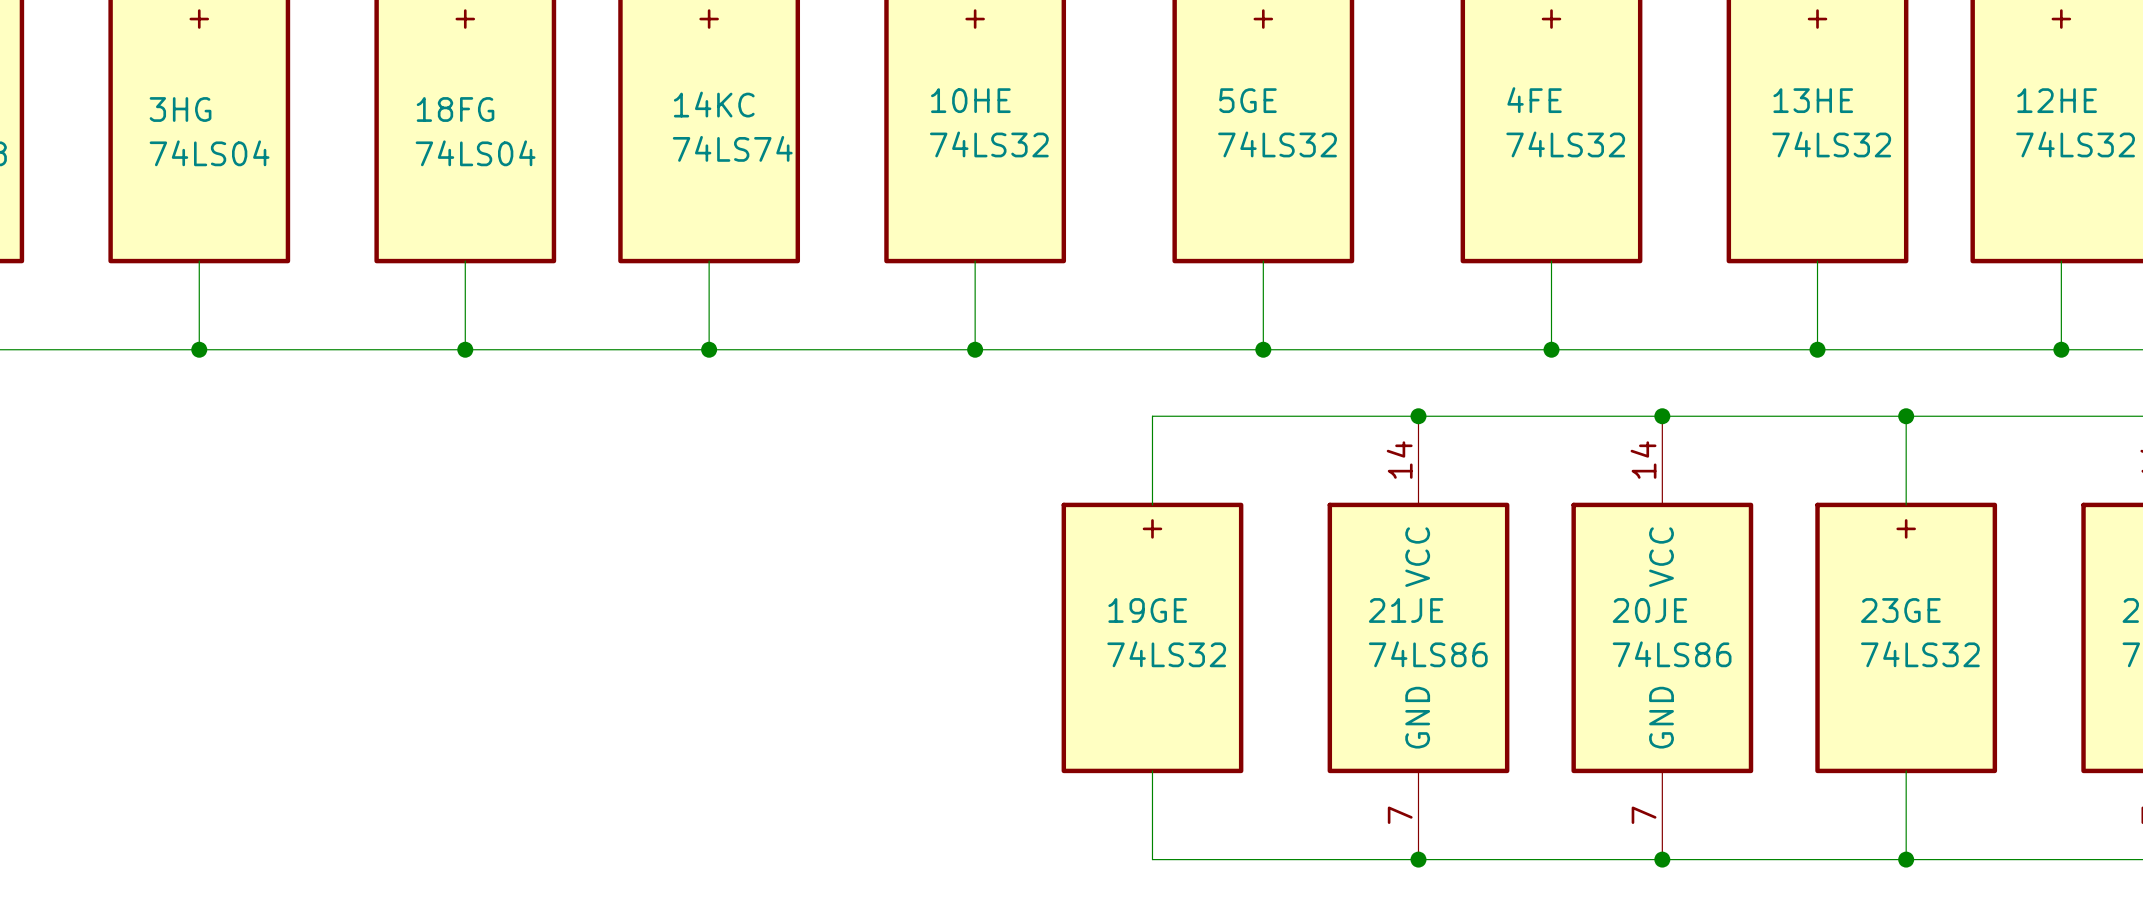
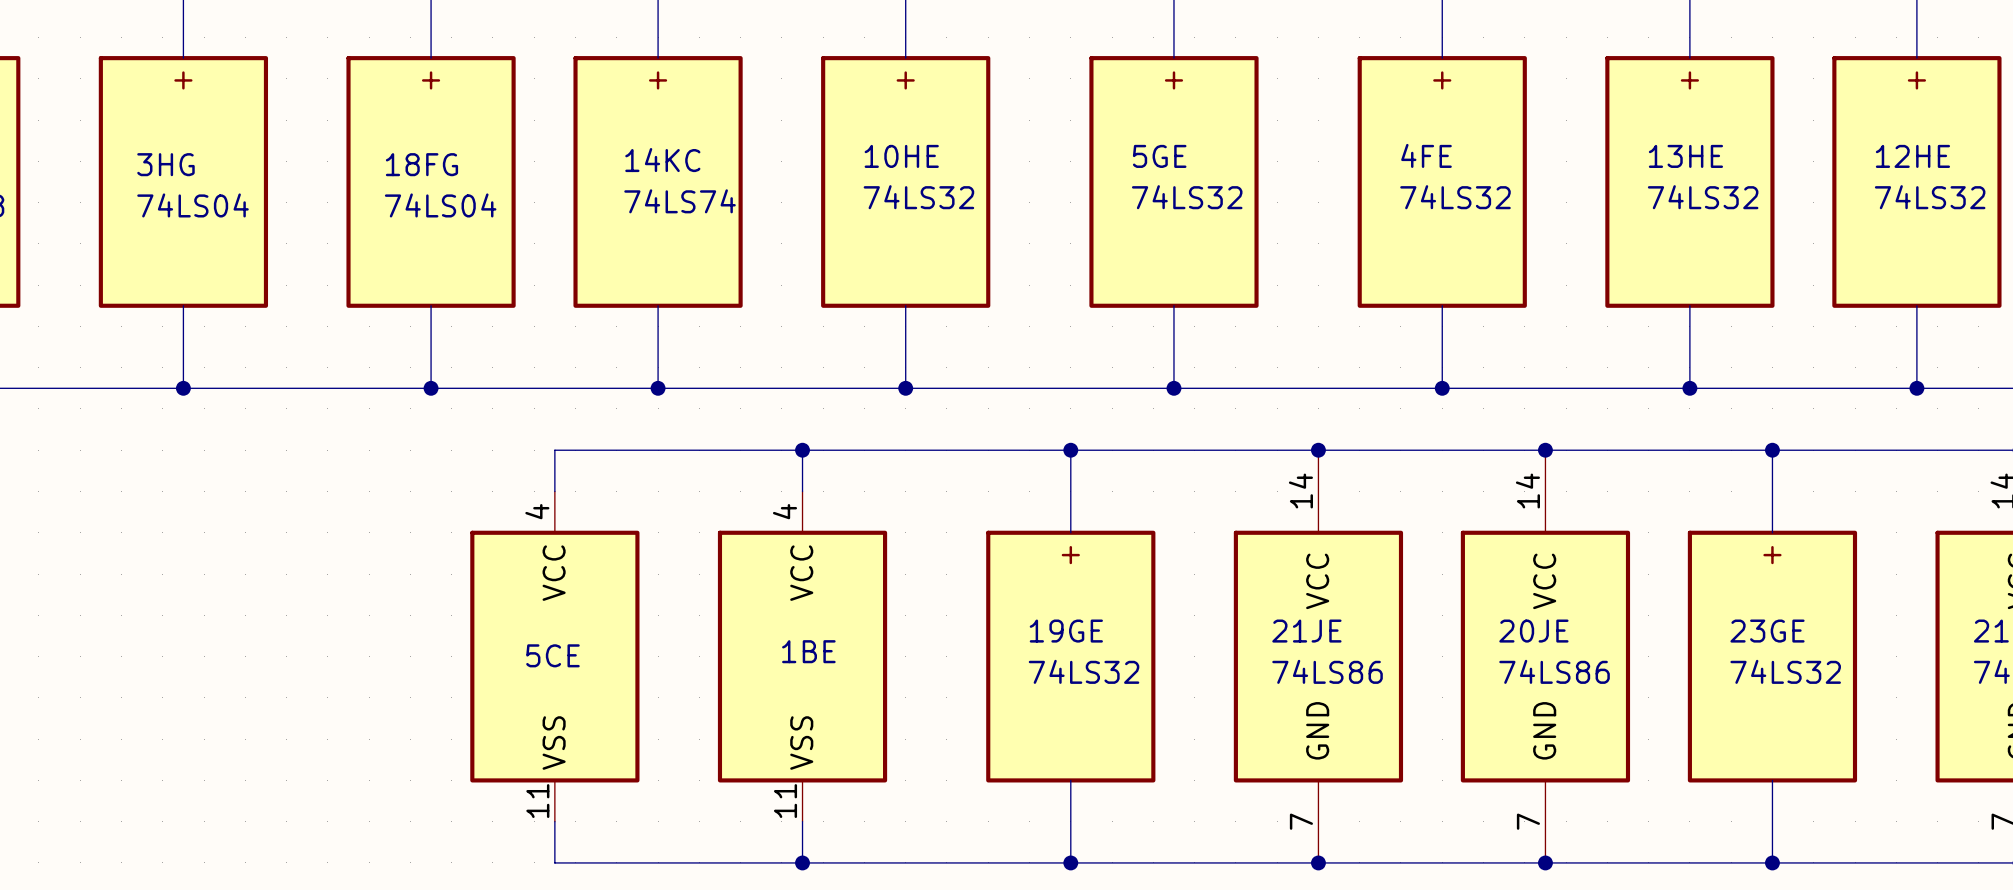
wire: none -> (802, 450) (802, 491)
junction: none -> (802, 450)
wire: none -> (1070, 450) (554, 450) (554, 491)
junction: none -> (1070, 450)
5CE: none -> (554, 656)
1BE: none -> (802, 656)
wire: none -> (554, 821) (554, 862) (1070, 862)
wire: none -> (802, 821) (802, 862)
junction: none -> (802, 862)
junction: none -> (1070, 862)

